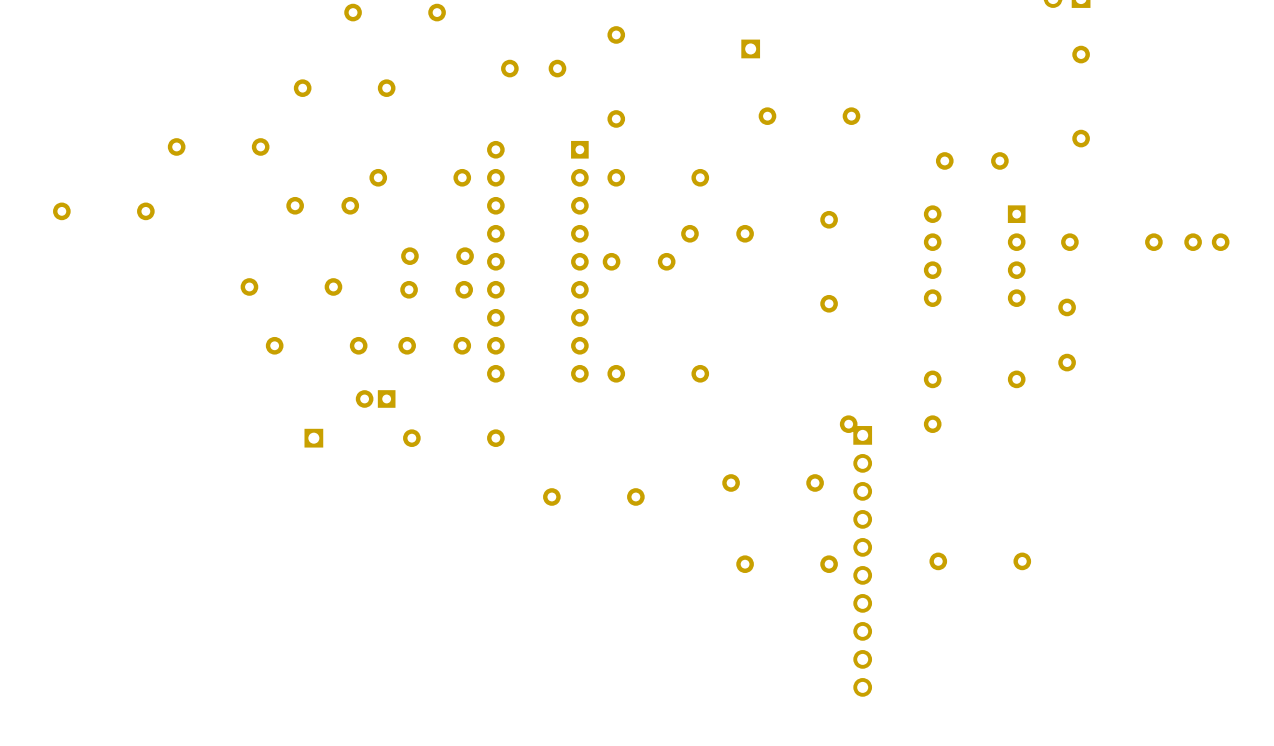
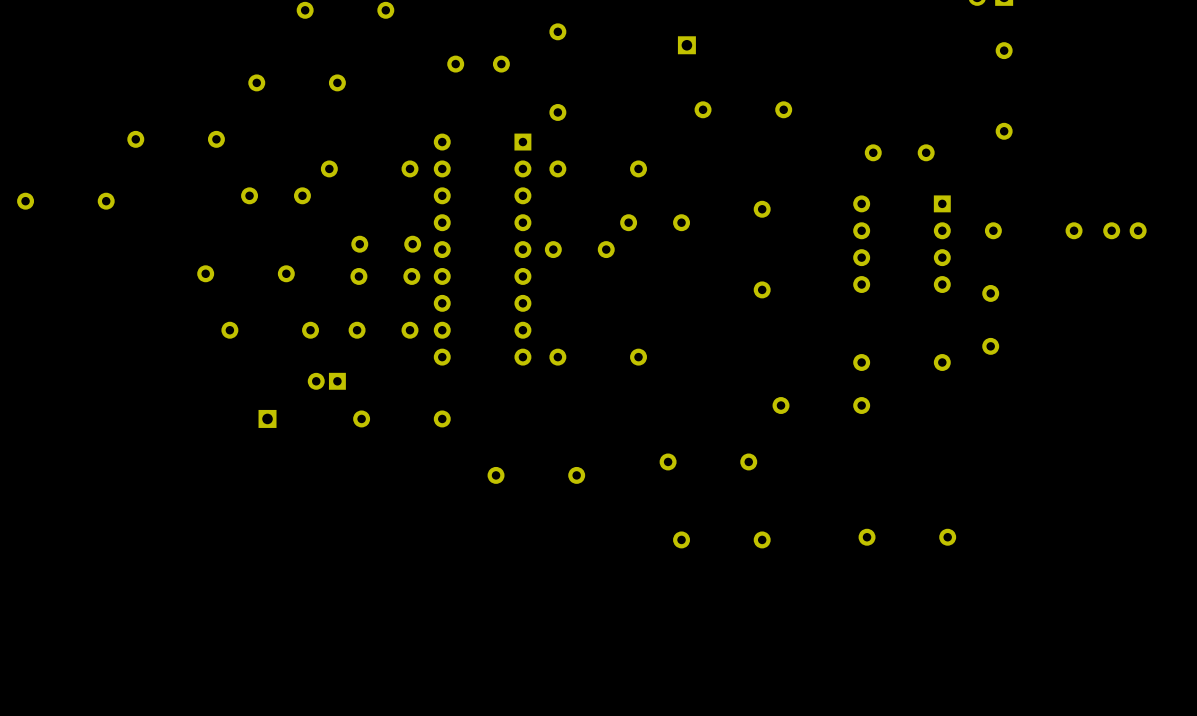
part: (862, 561) -> none

